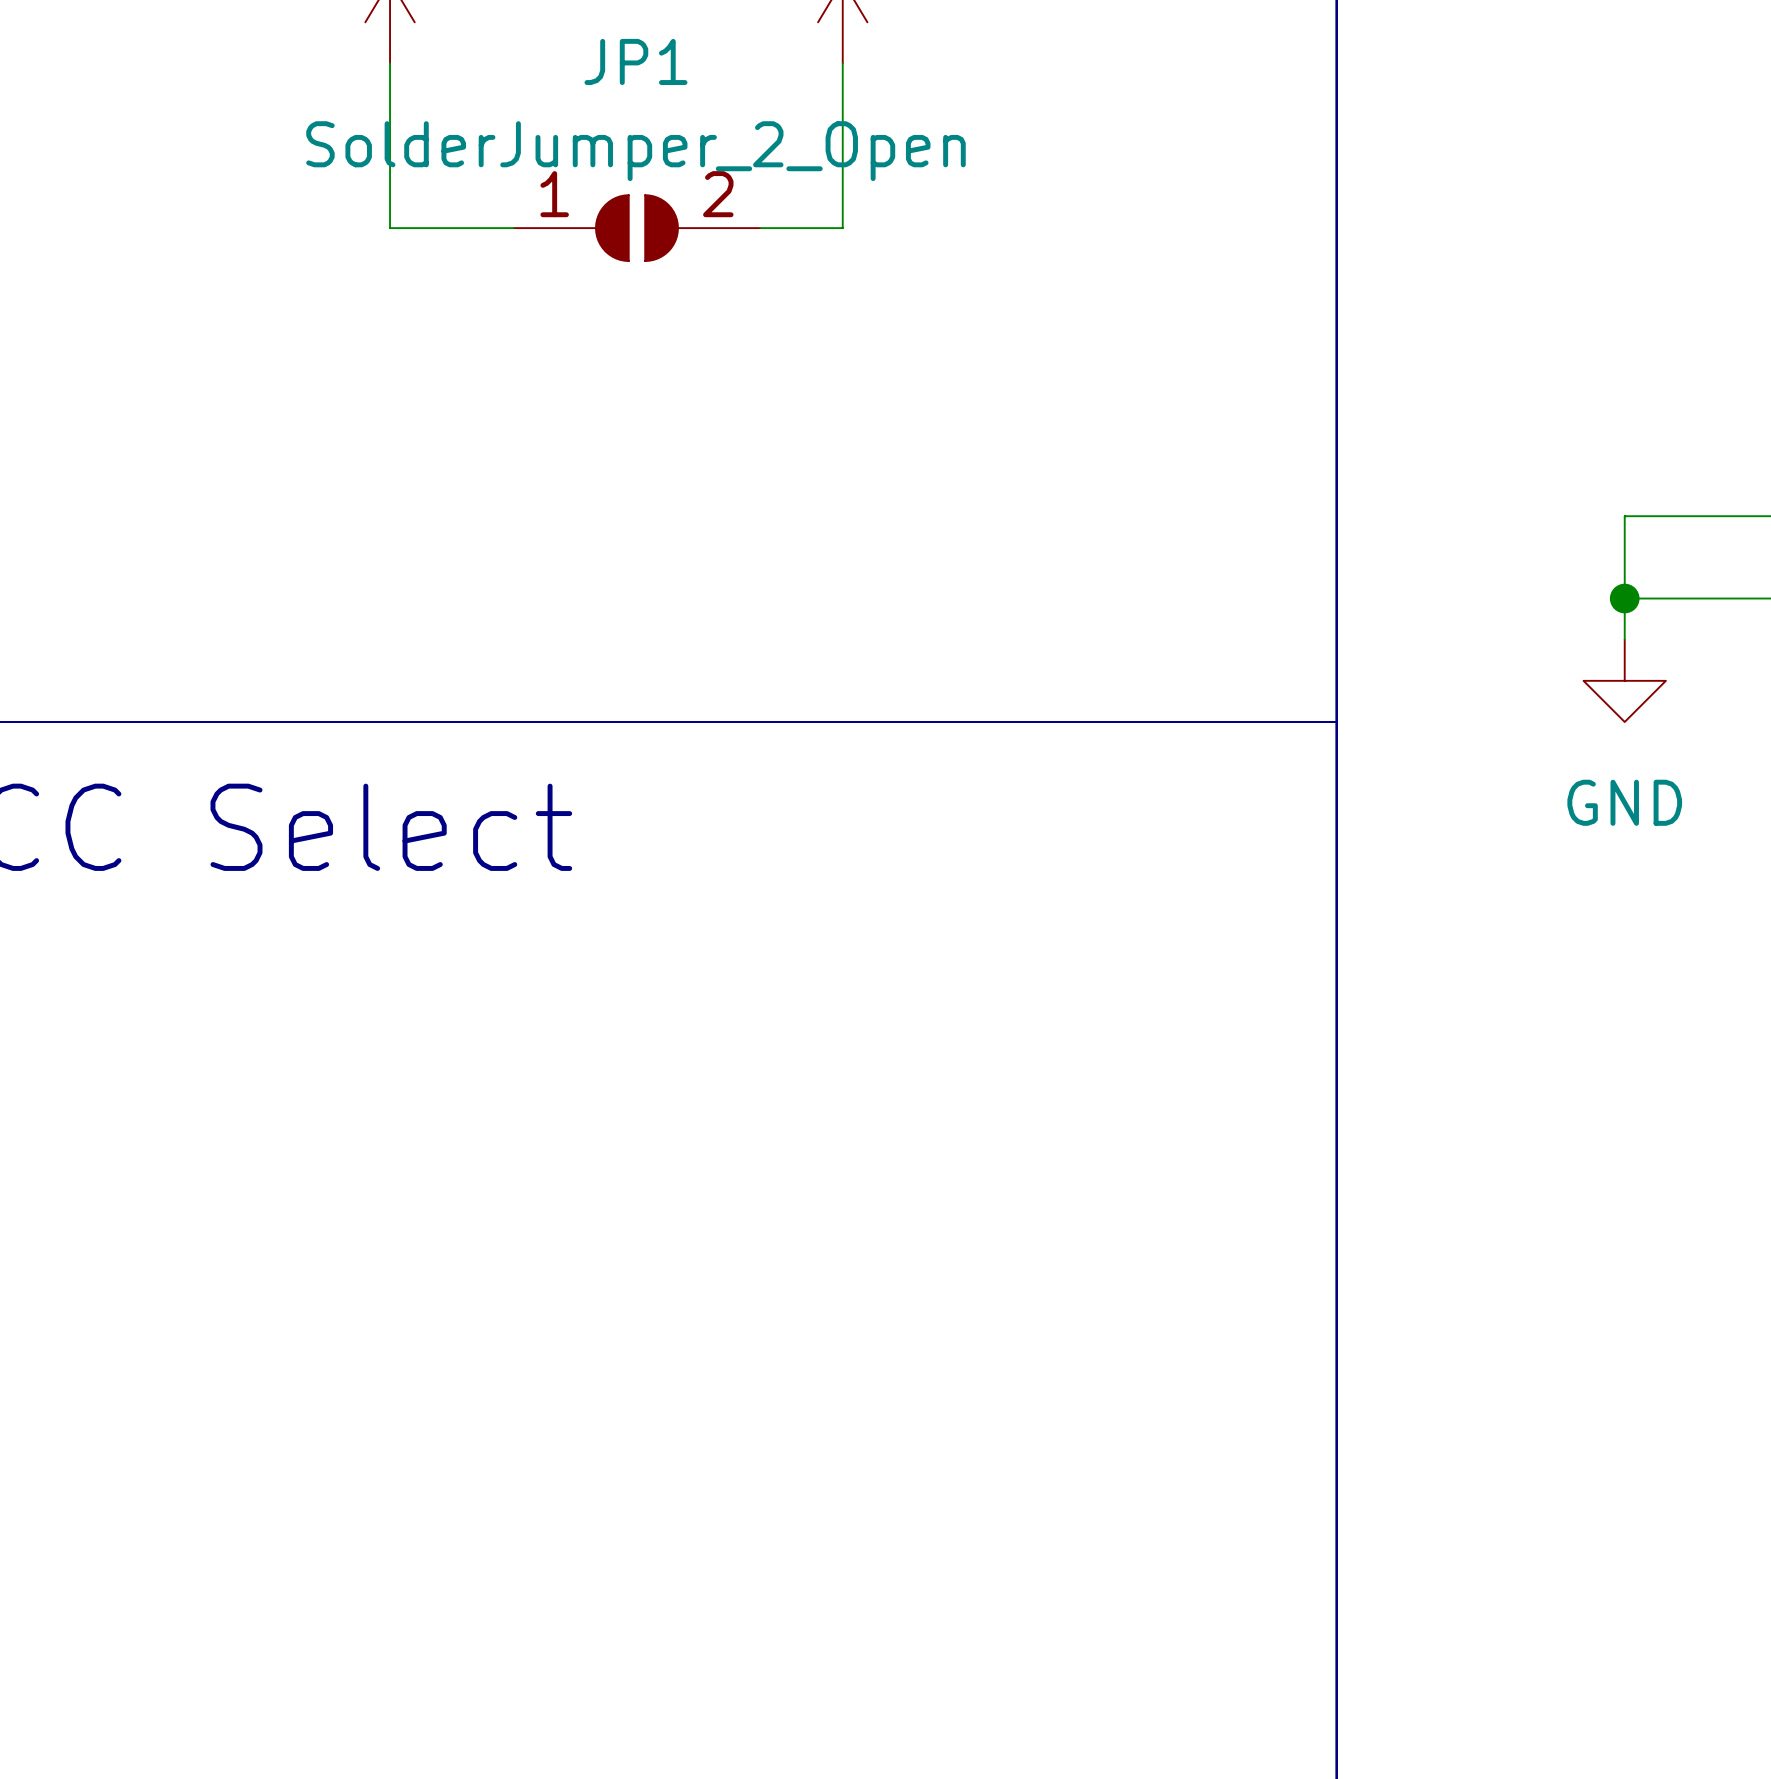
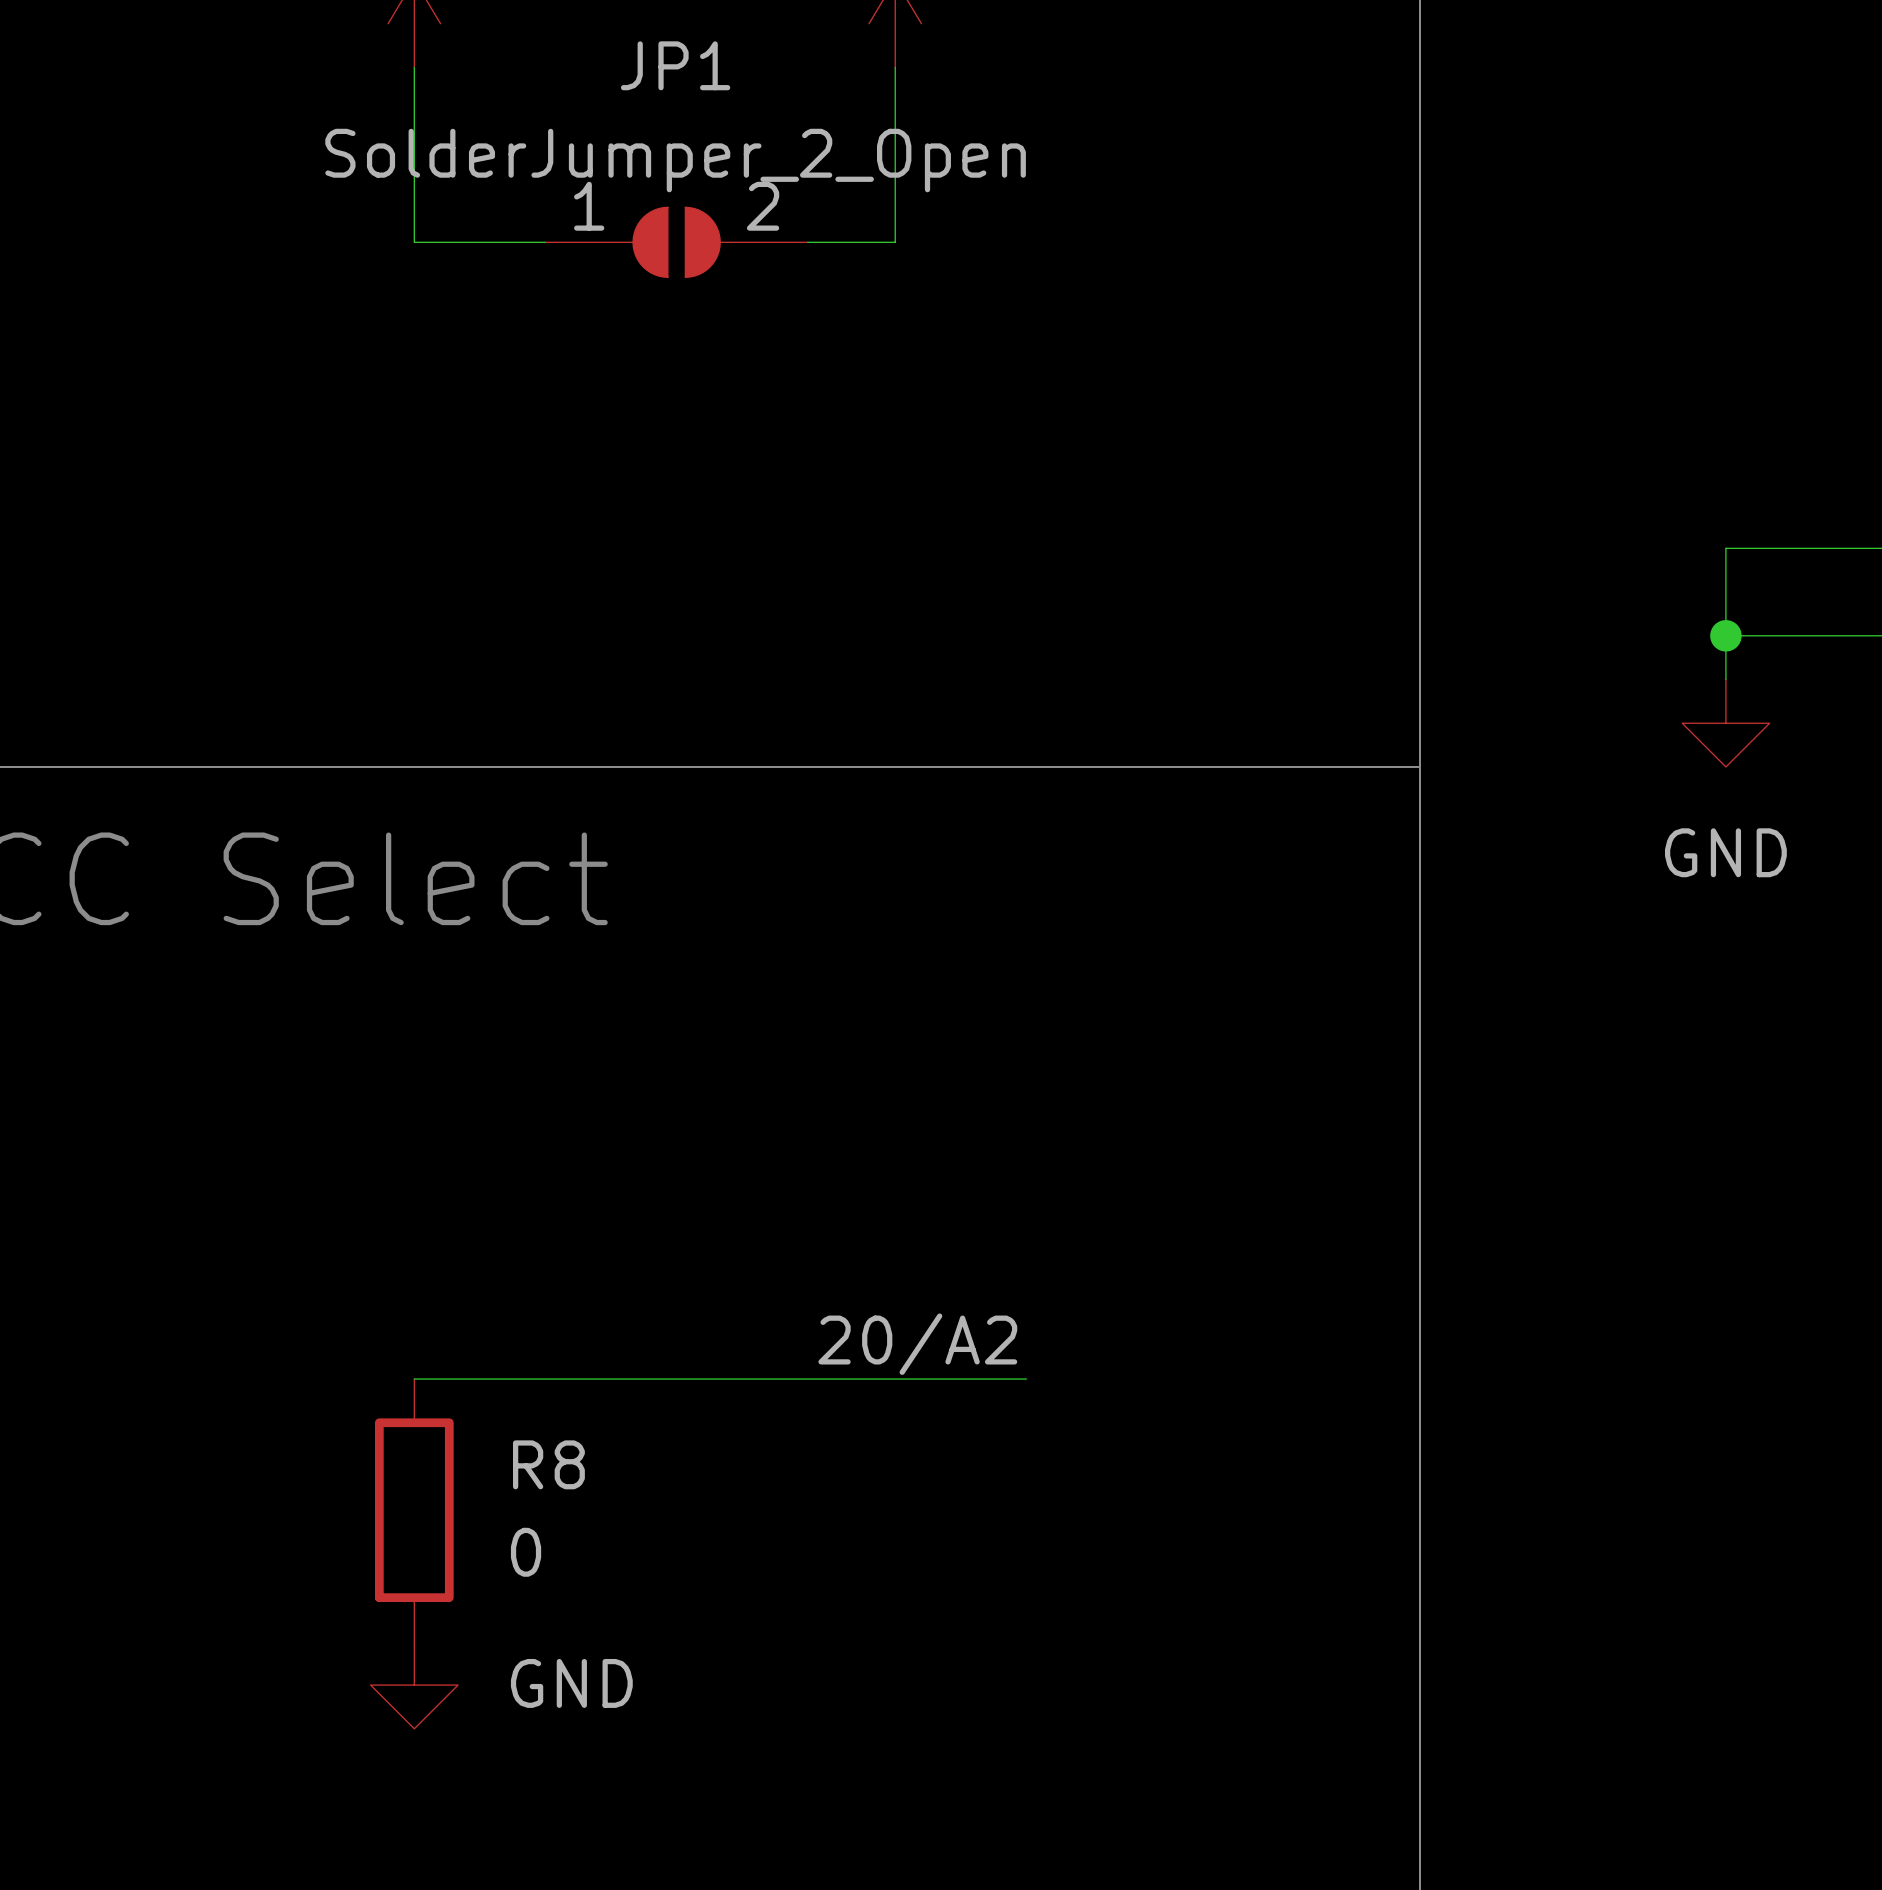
label: none -> 20/A2 (917, 1344)
wire: none -> (414, 1379) (1026, 1379)
R8: none -> 0 (414, 1510)
power symbol: none -> GND (414, 1685)

